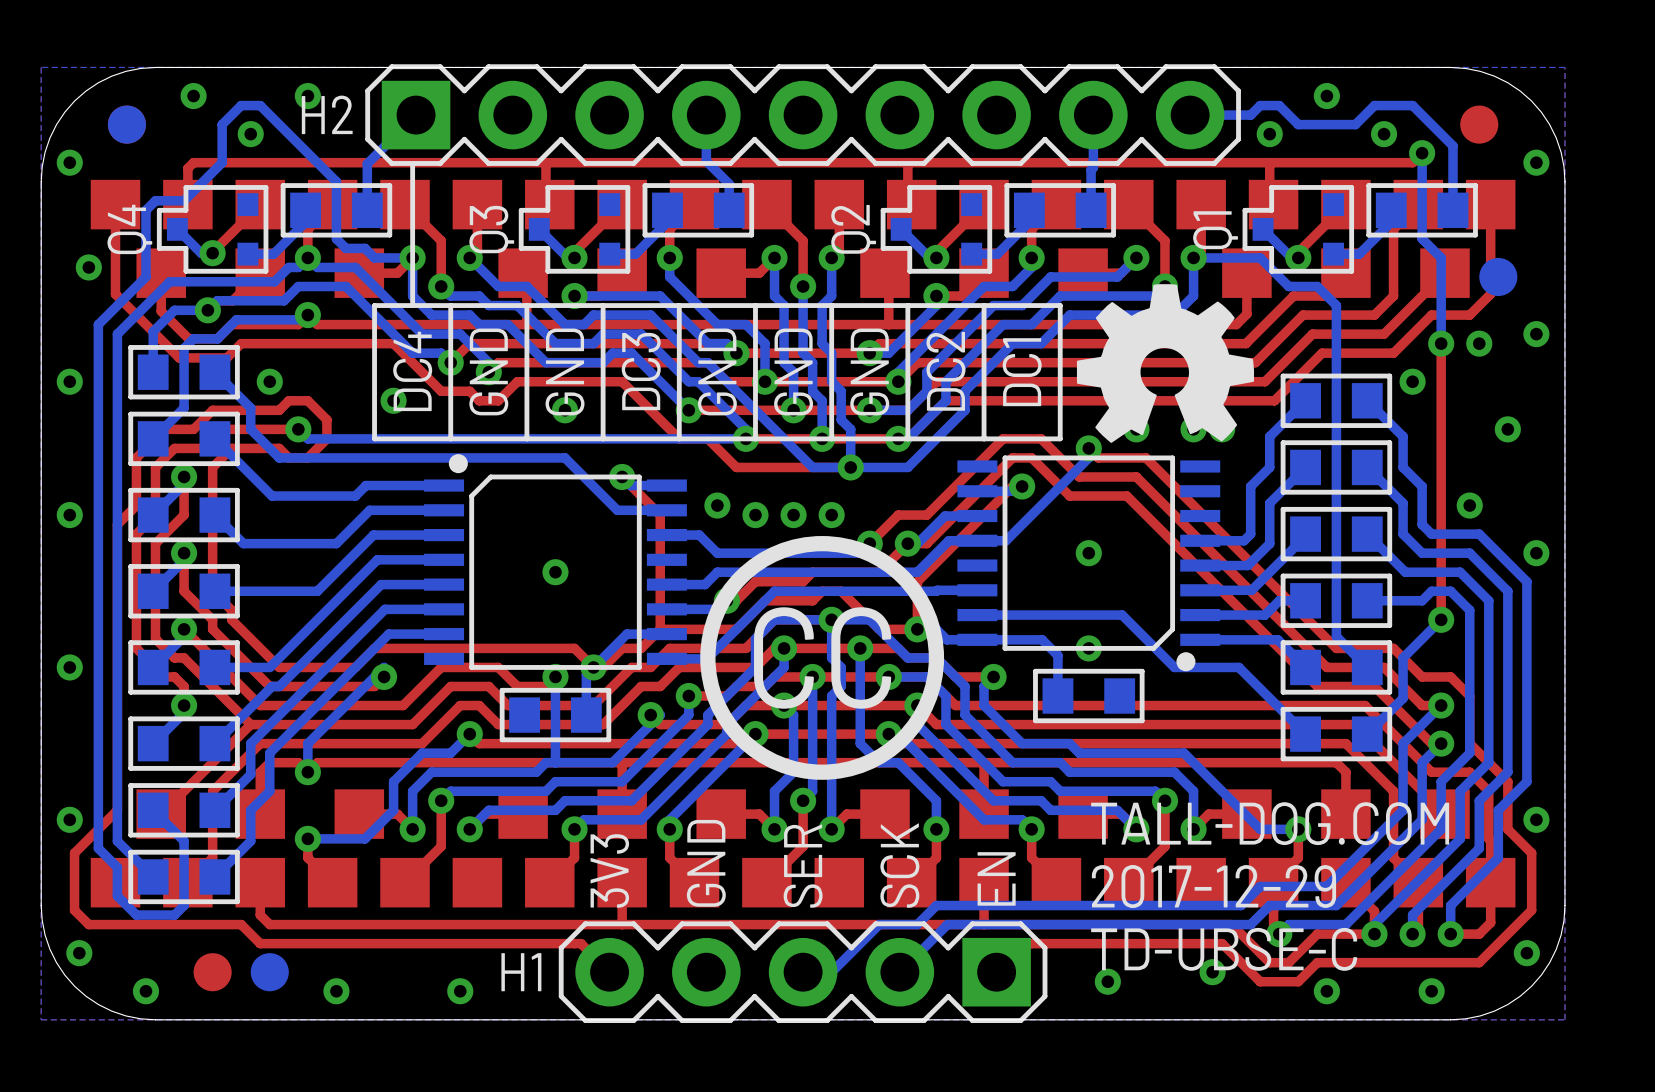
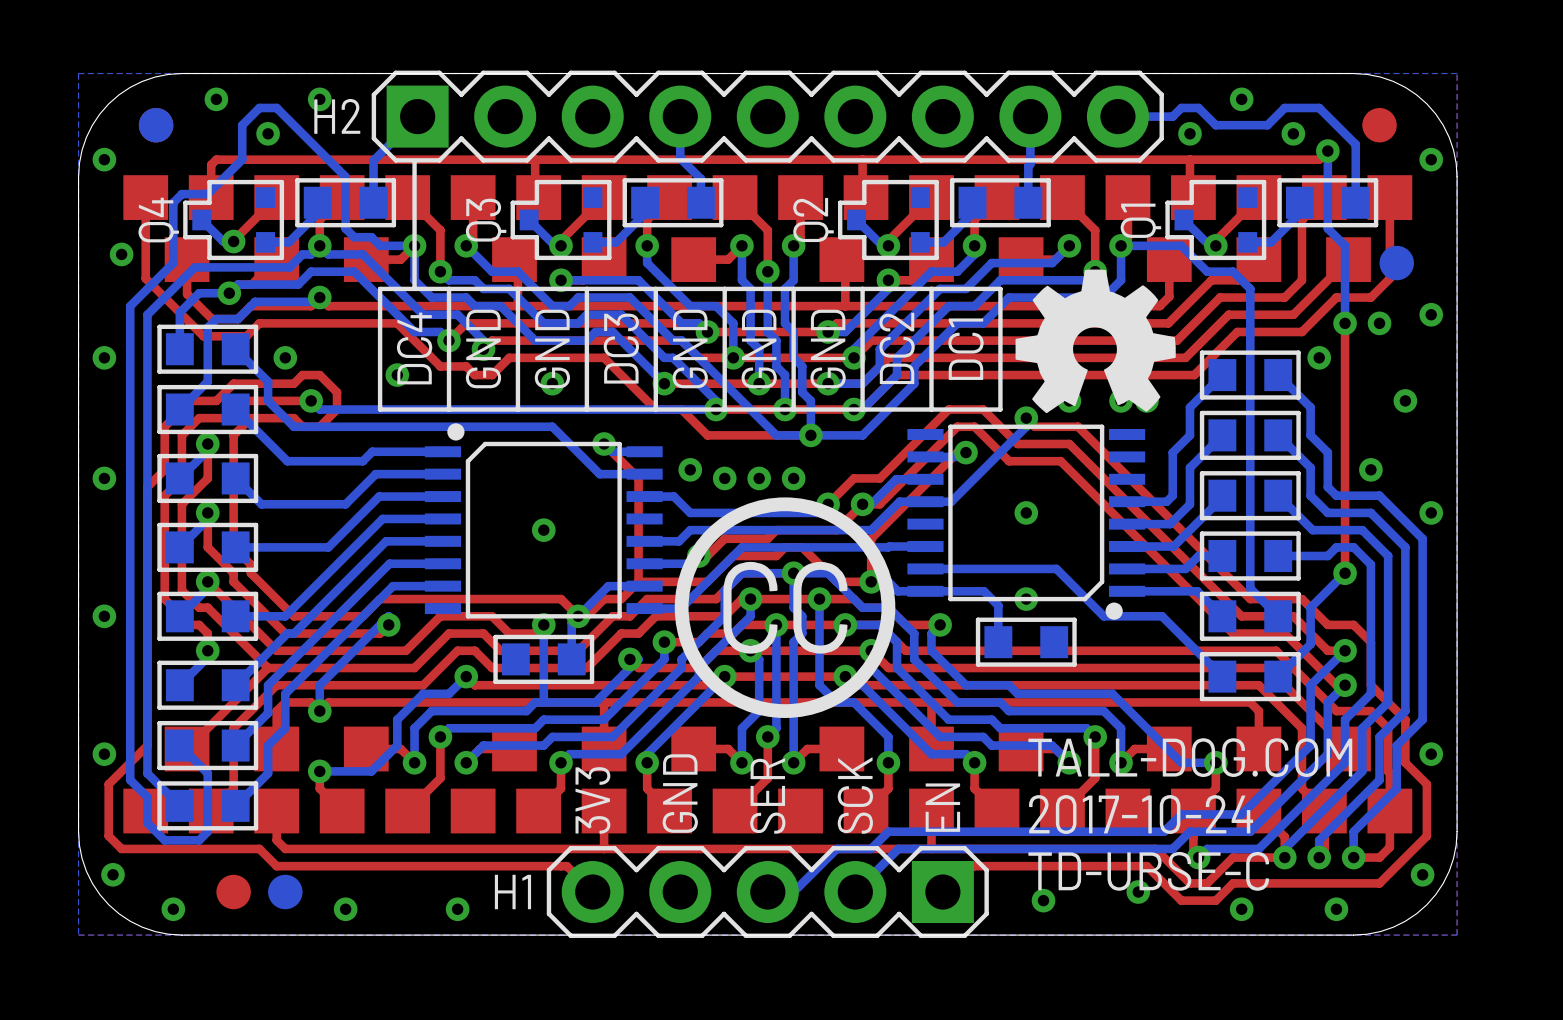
text: 2017-12-29 (1213, 886) -> 2017-10-24 (1141, 814)

